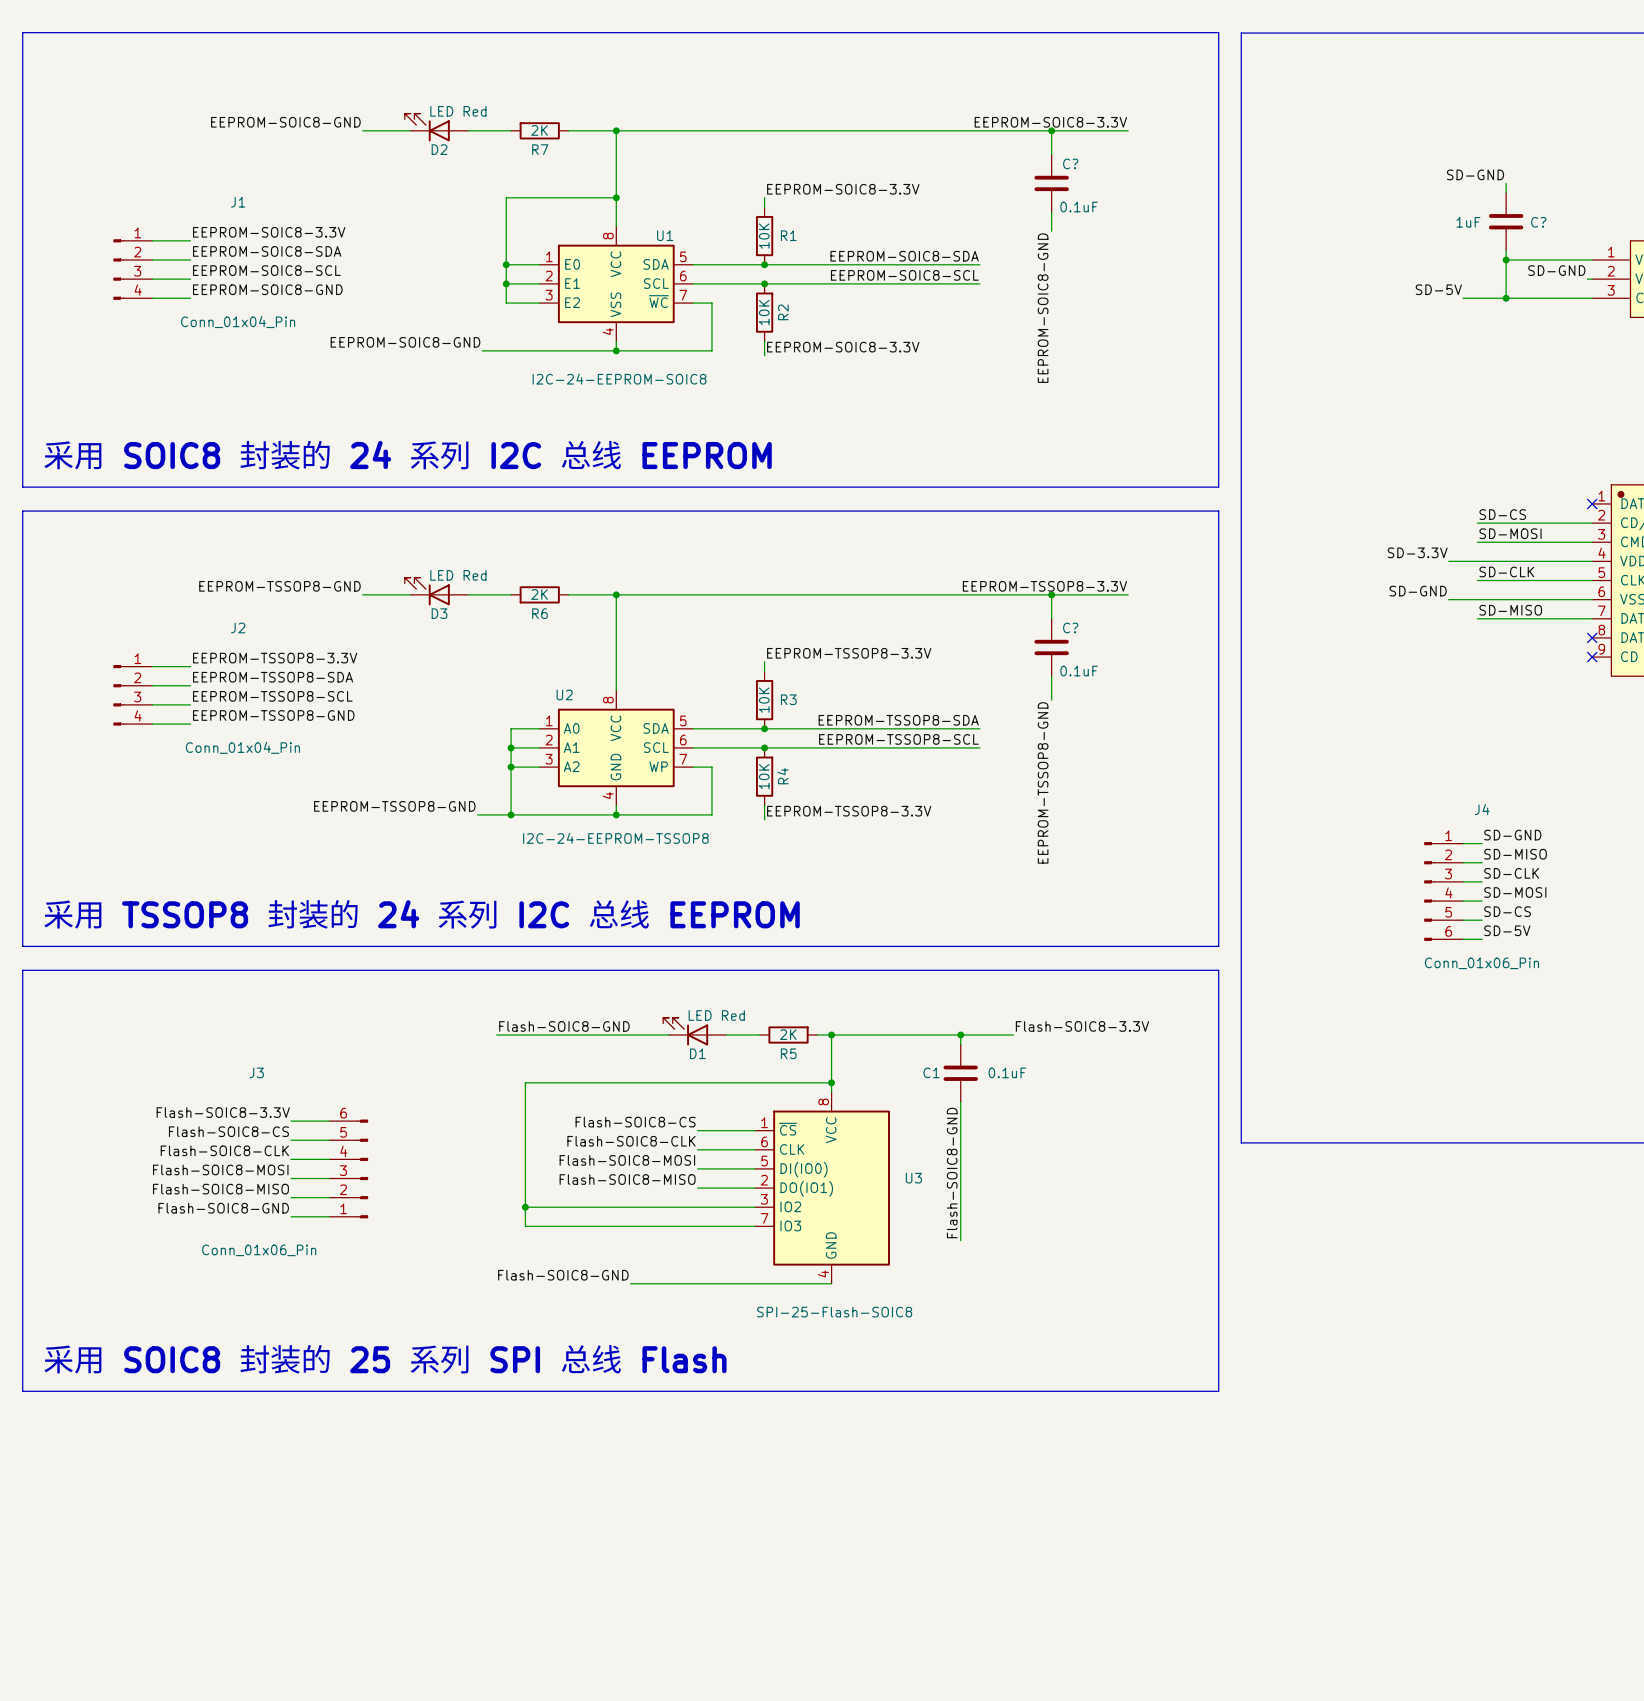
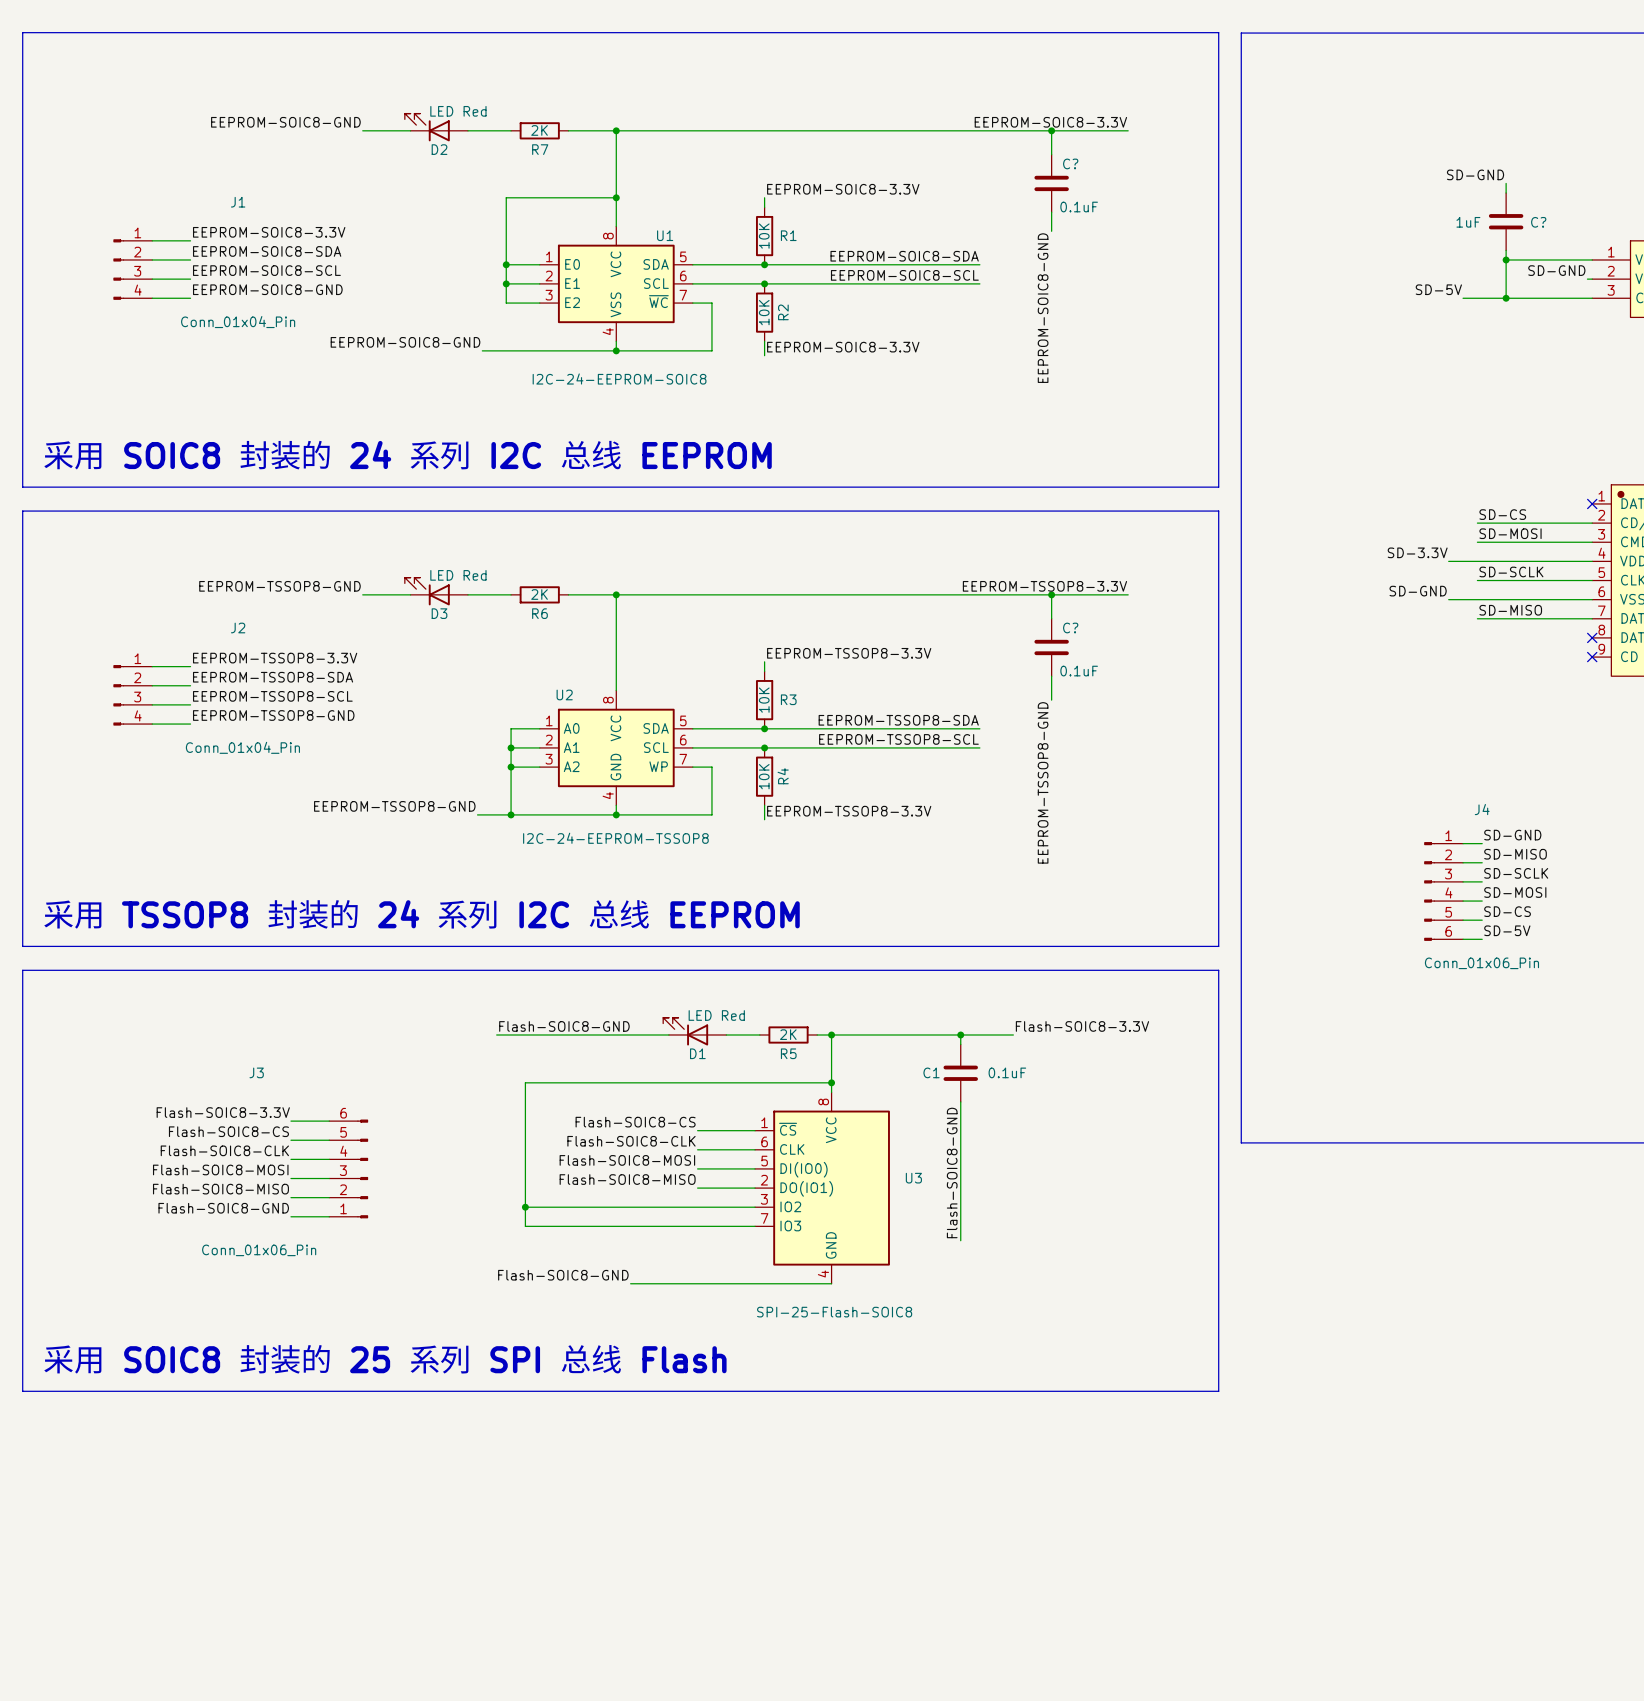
label: SD-CLK (1506, 571) -> SD-SCLK (1511, 571)
label: SD-CLK (1511, 873) -> SD-SCLK (1516, 873)

